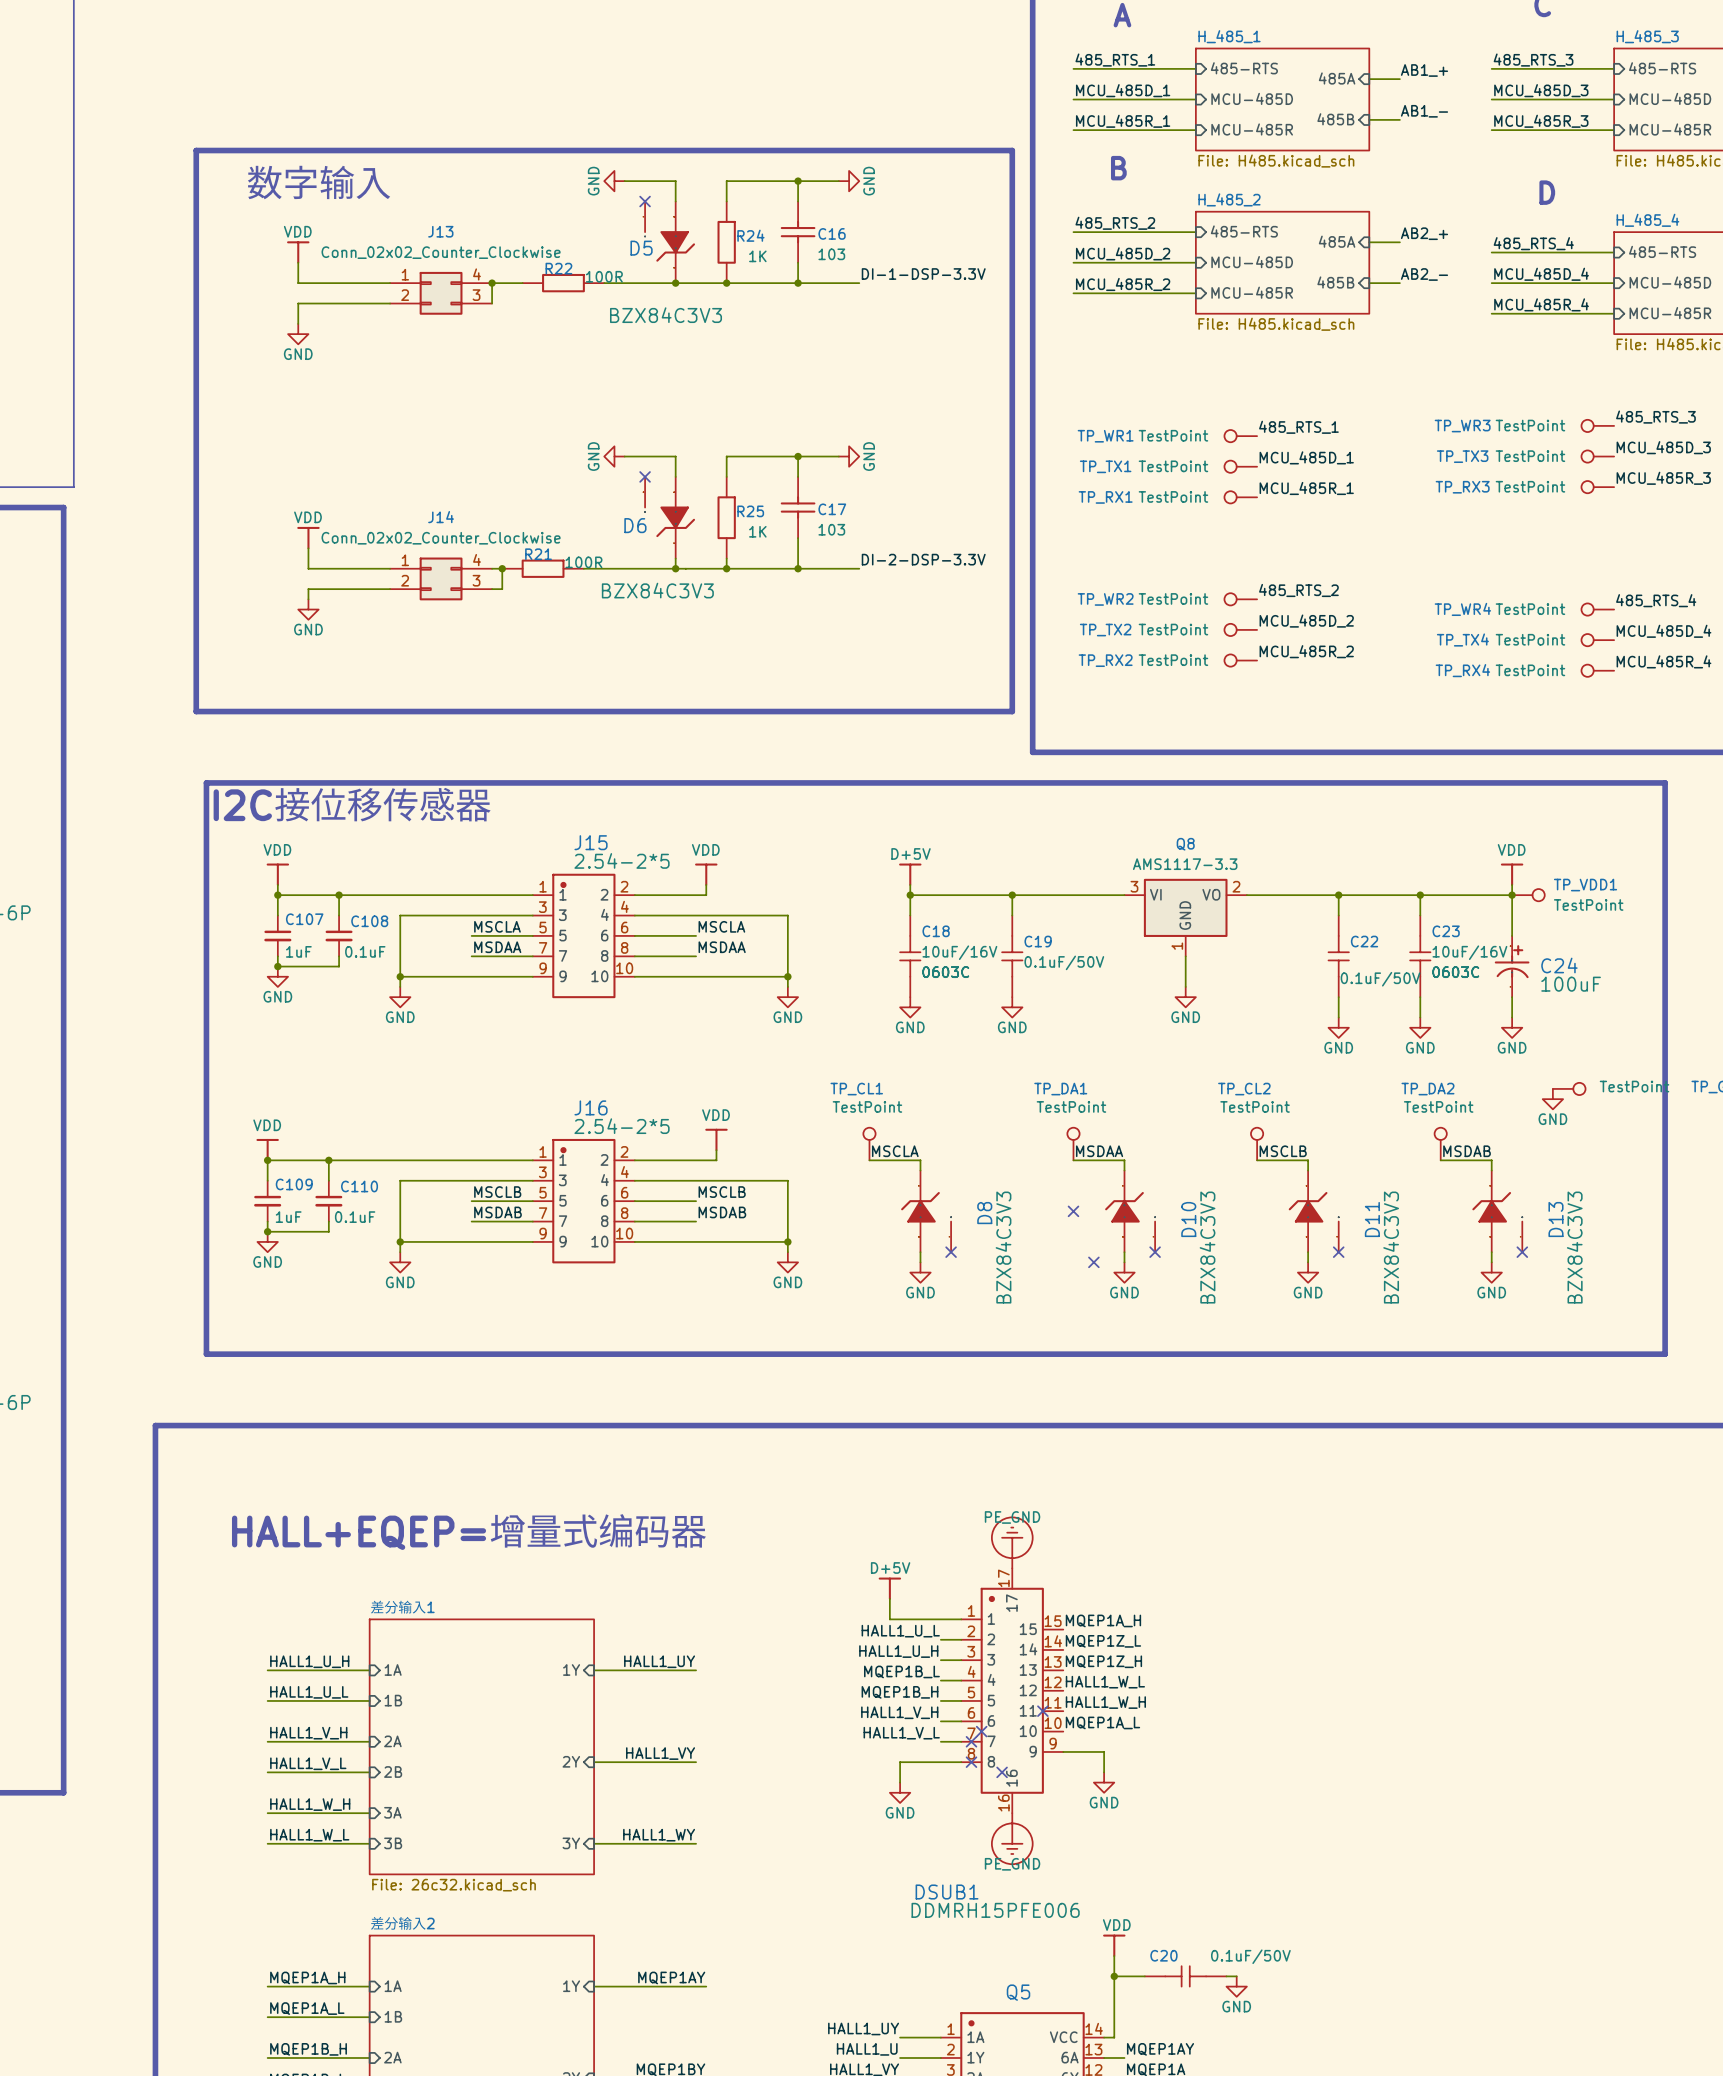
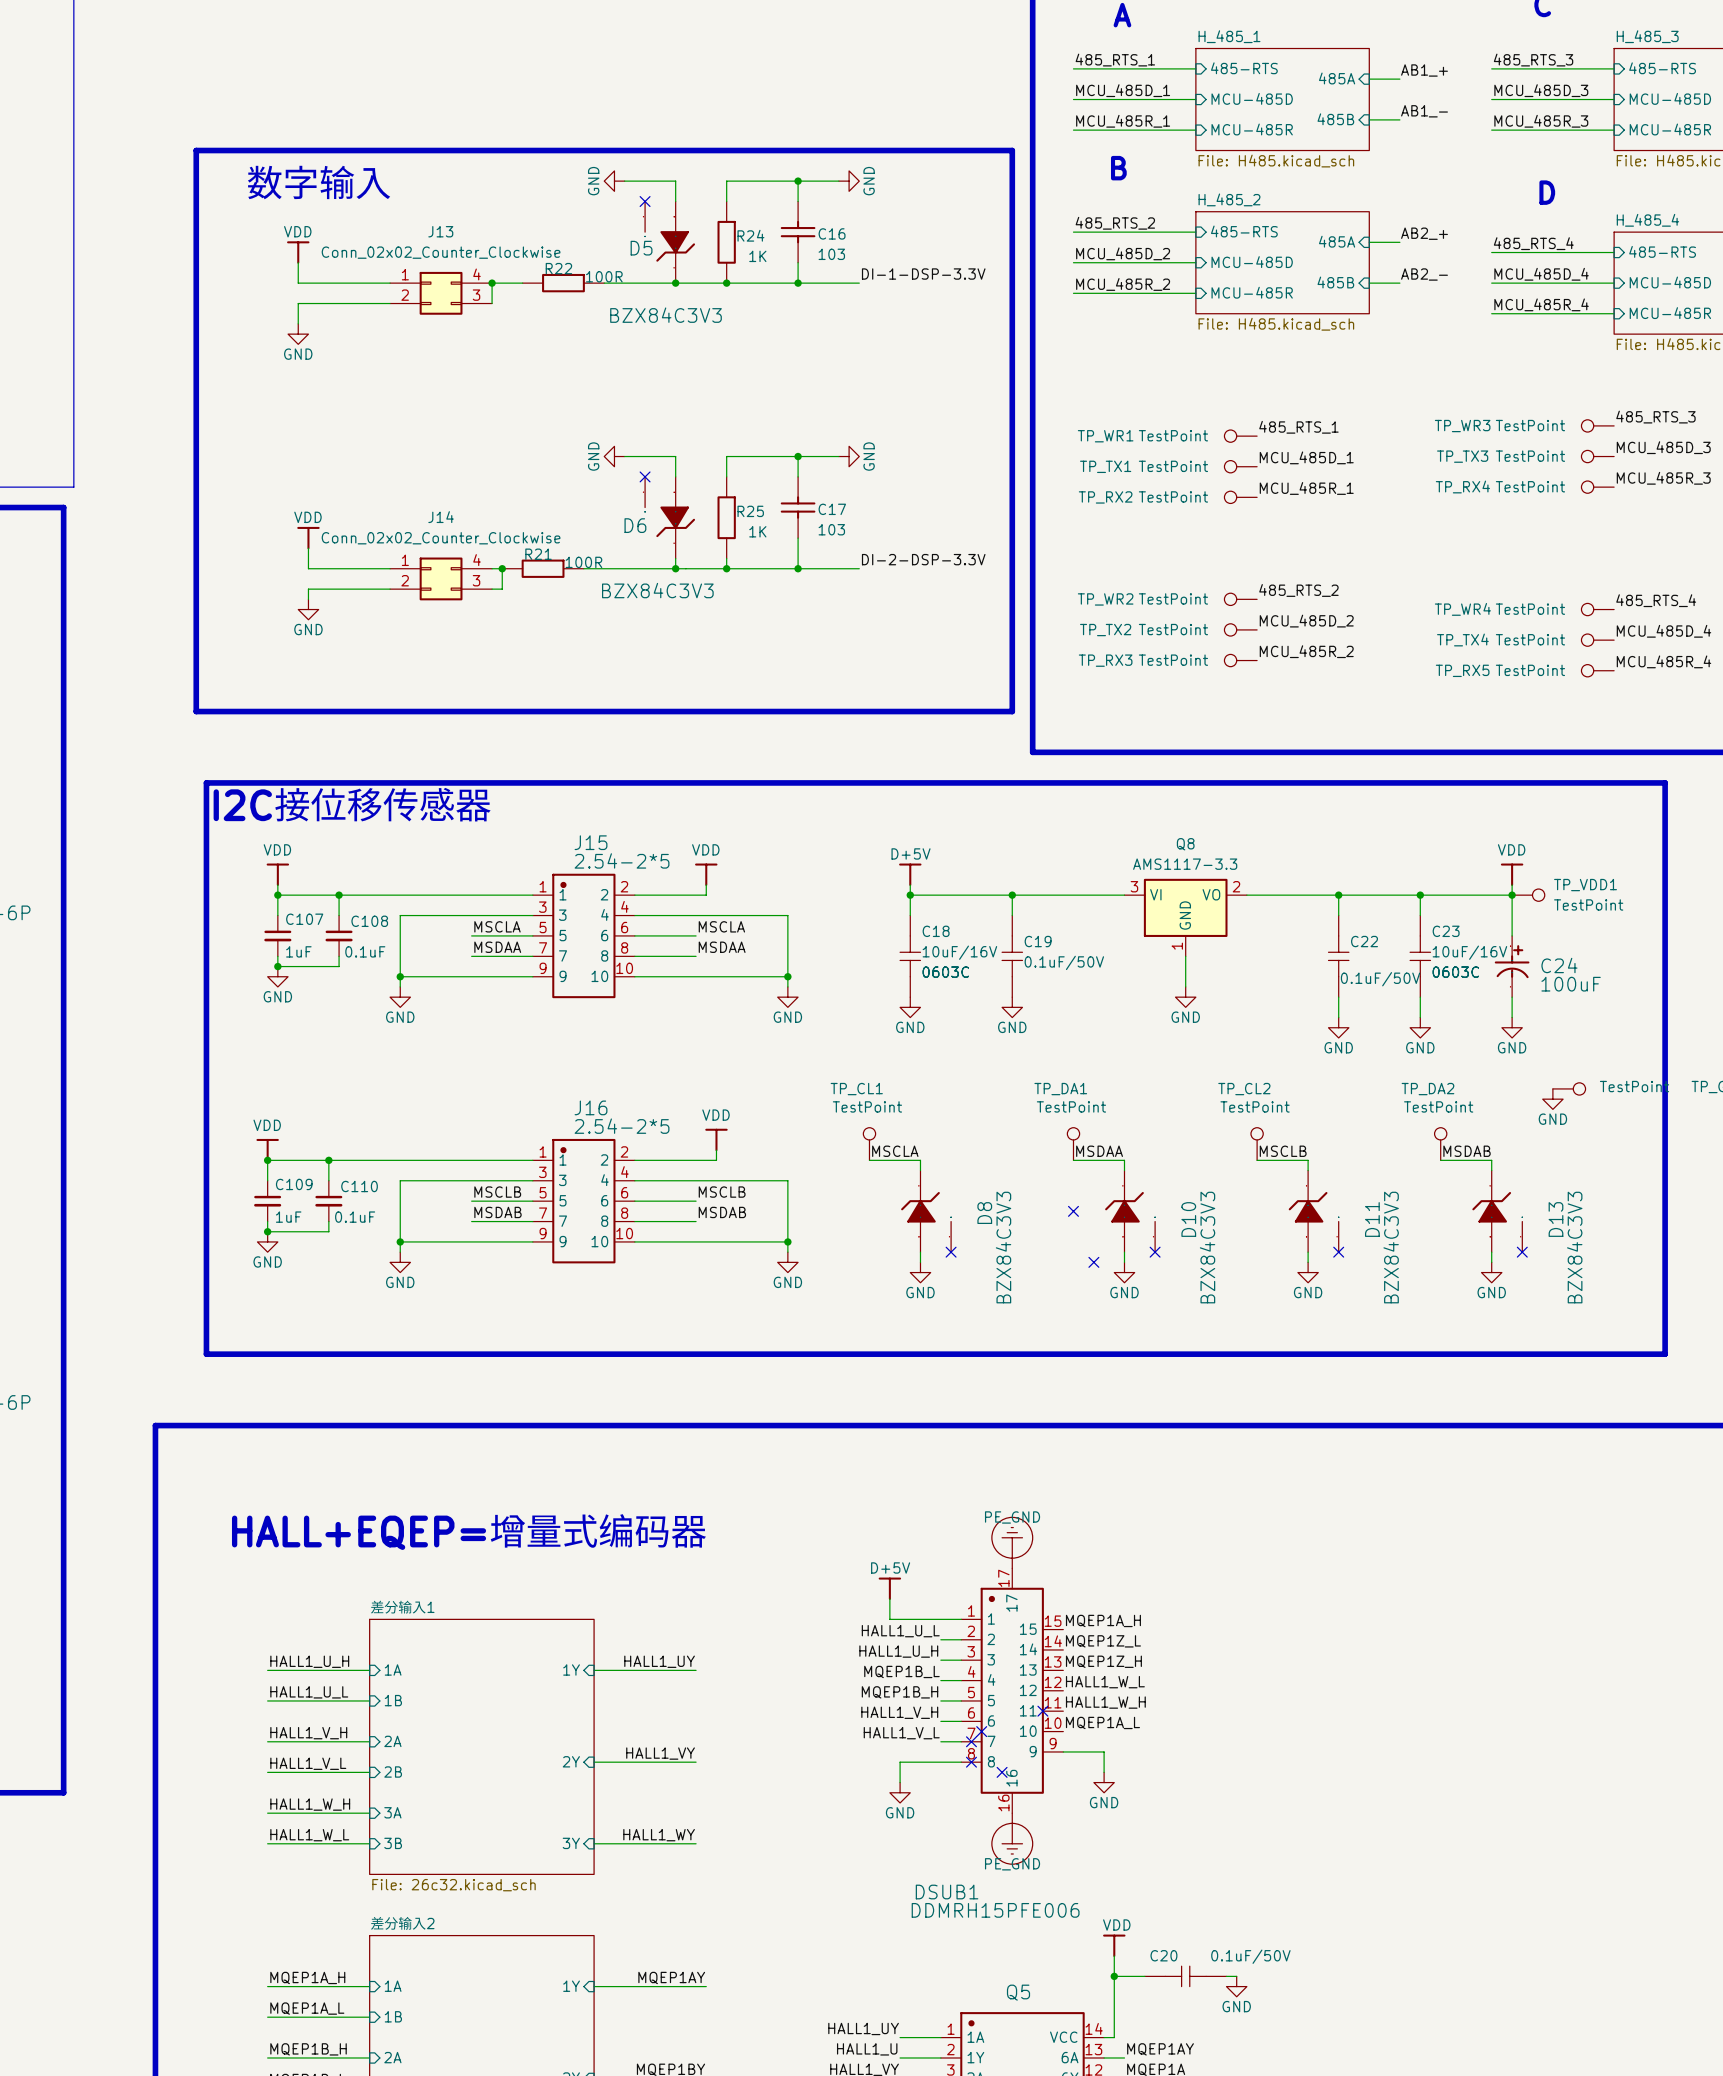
TP_RX3 name: TP_RX3 (1462, 487) -> TP_RX4 (1462, 486)
TP_RX1 name: TP_RX1 (1105, 497) -> TP_RX2 (1105, 497)
TP_RX2 name: TP_RX2 (1105, 660) -> TP_RX3 (1105, 660)
TP_RX4 name: TP_RX4 (1462, 670) -> TP_RX5 (1462, 670)

